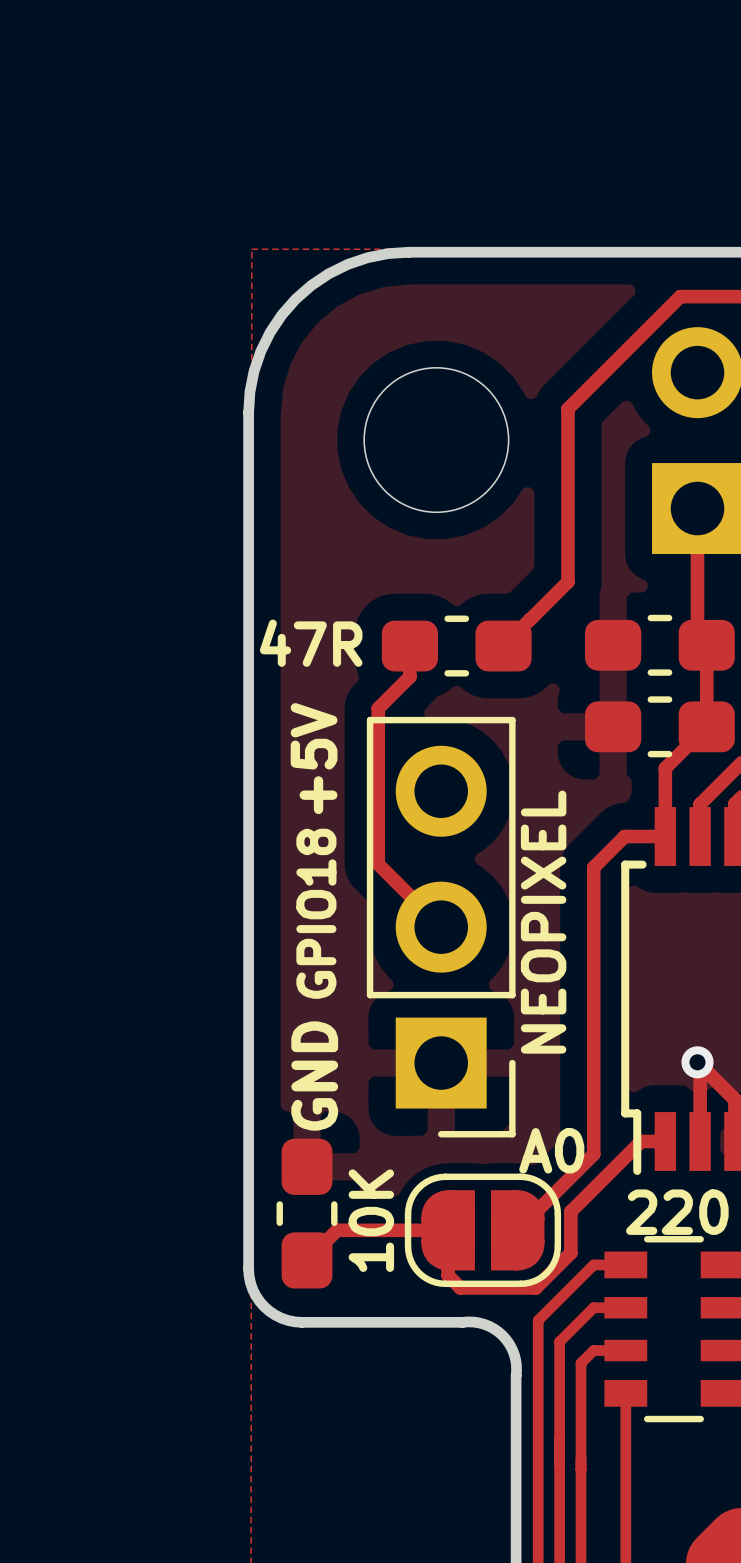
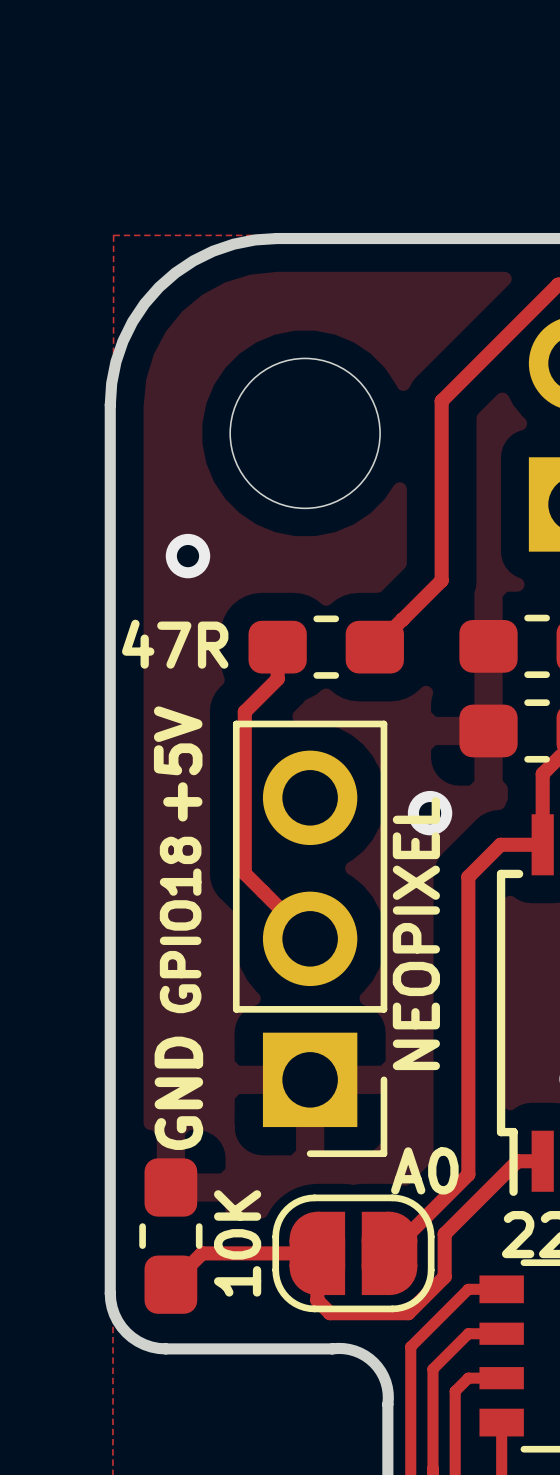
via: none -> (187, 556)
via: none -> (430, 813)

